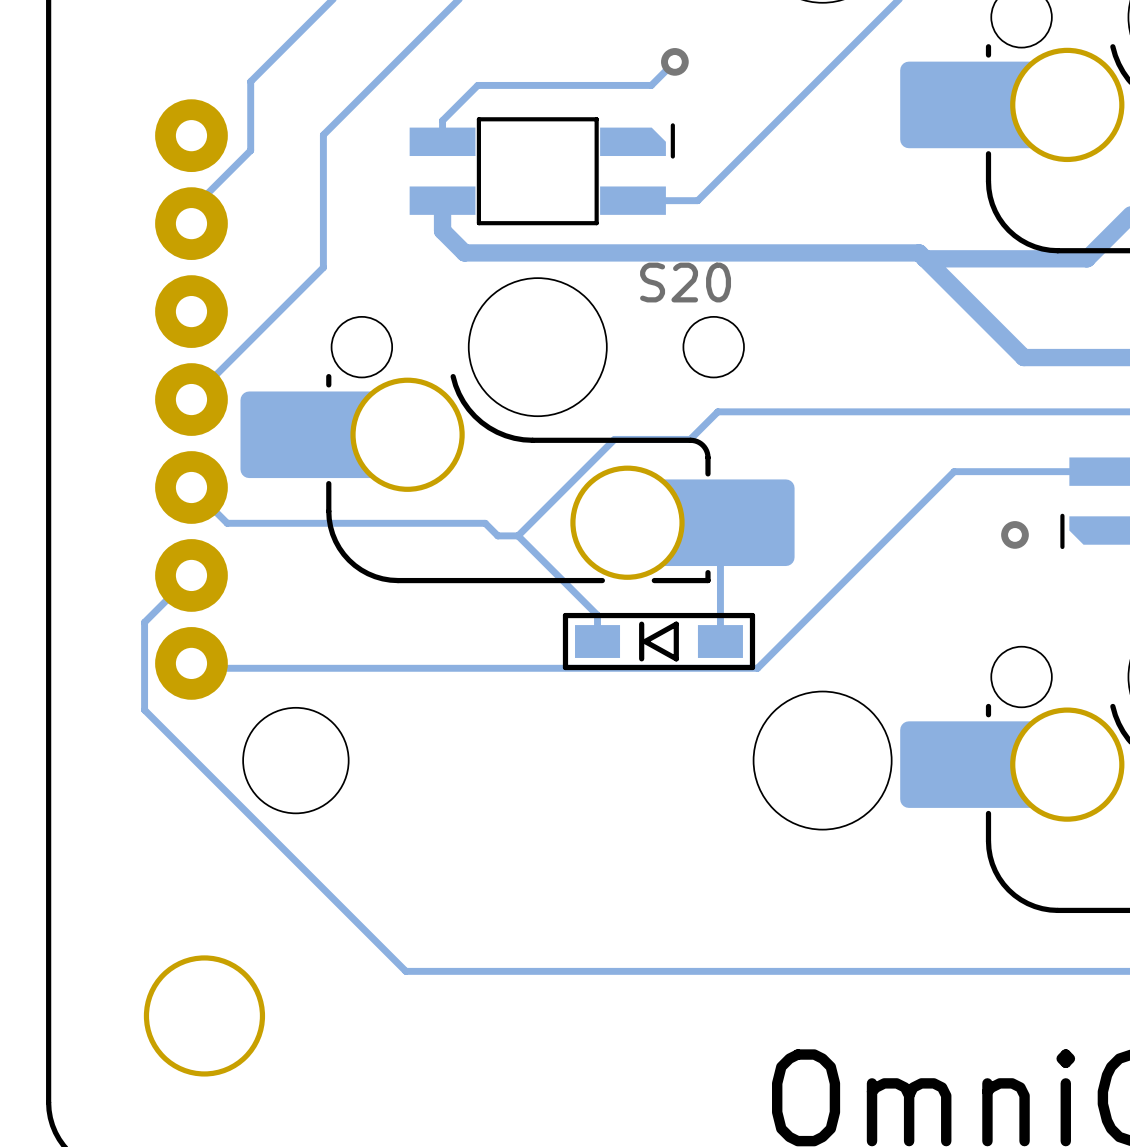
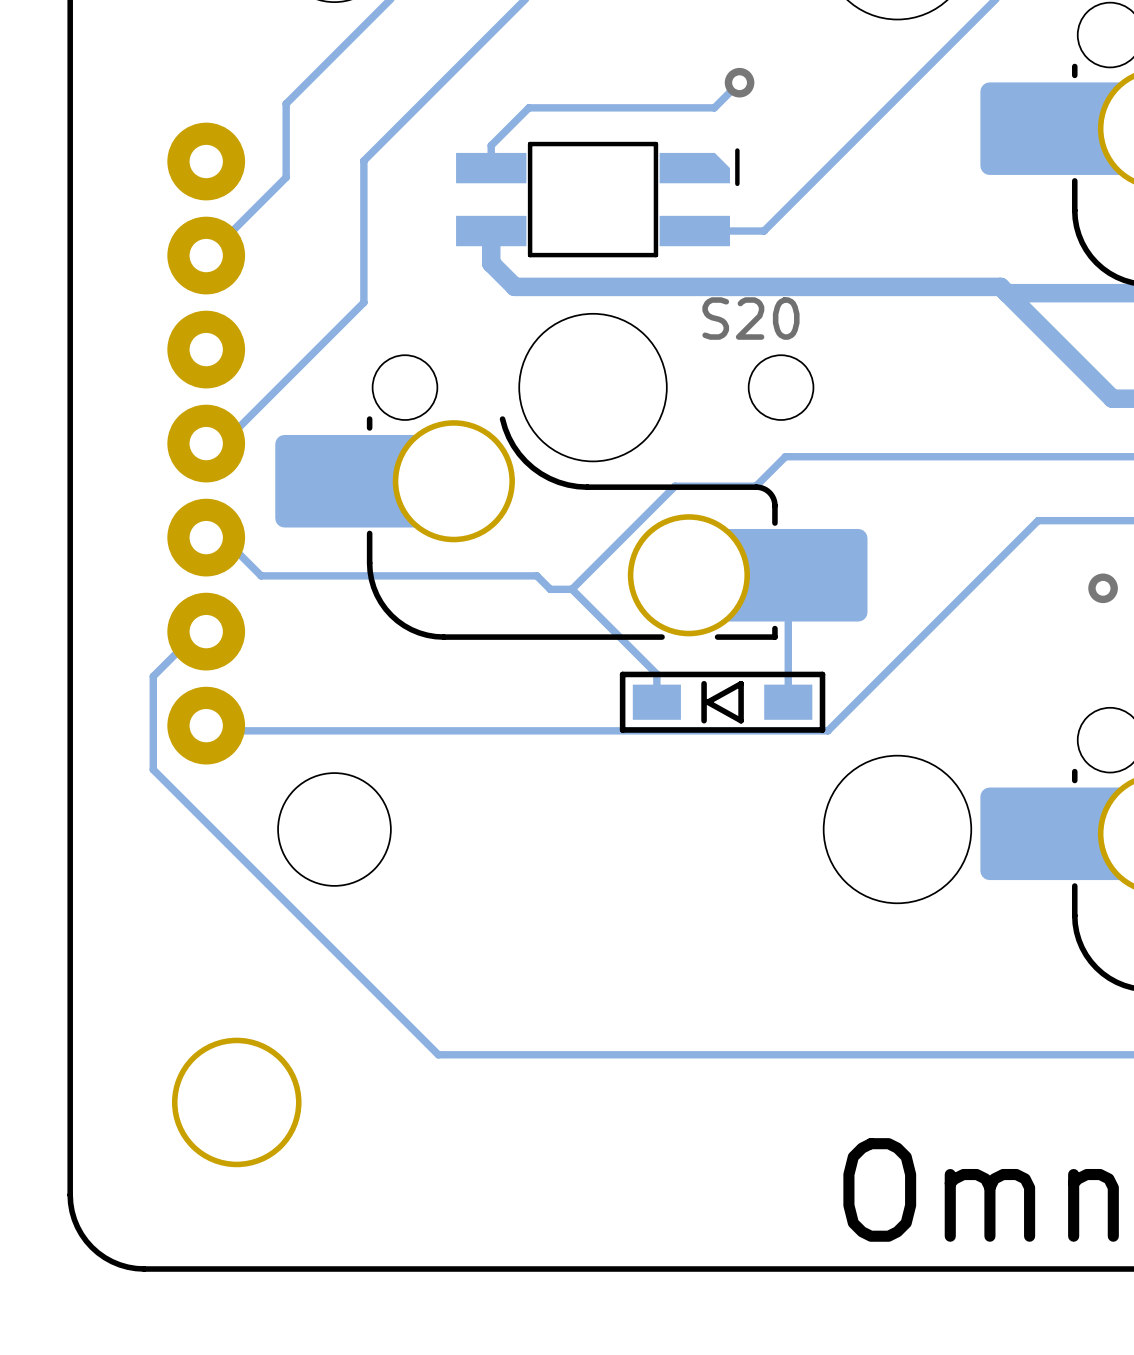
part position: (191, 399) -> (206, 443)
track: (191, 575) (144, 622) (144, 710) (405, 971) -> (198, 631) (153, 676) (153, 769) (438, 1054) (452, 1054)

